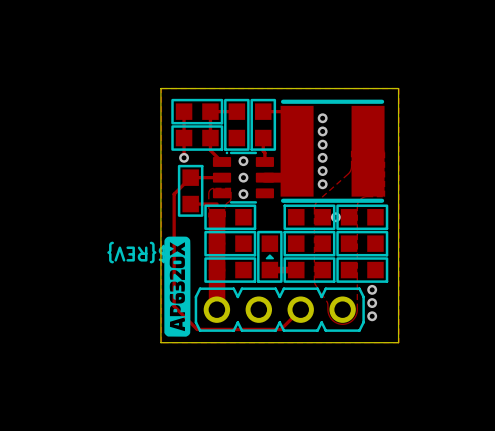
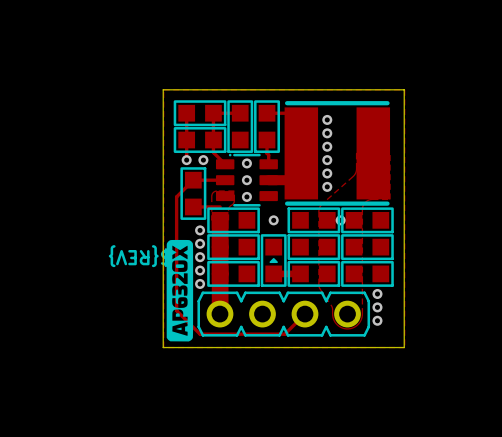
via: none -> (203, 160)
via: none -> (273, 220)
via: none -> (200, 230)
via: none -> (200, 243)
via: none -> (200, 257)
via: none -> (200, 270)
via: none -> (200, 283)

